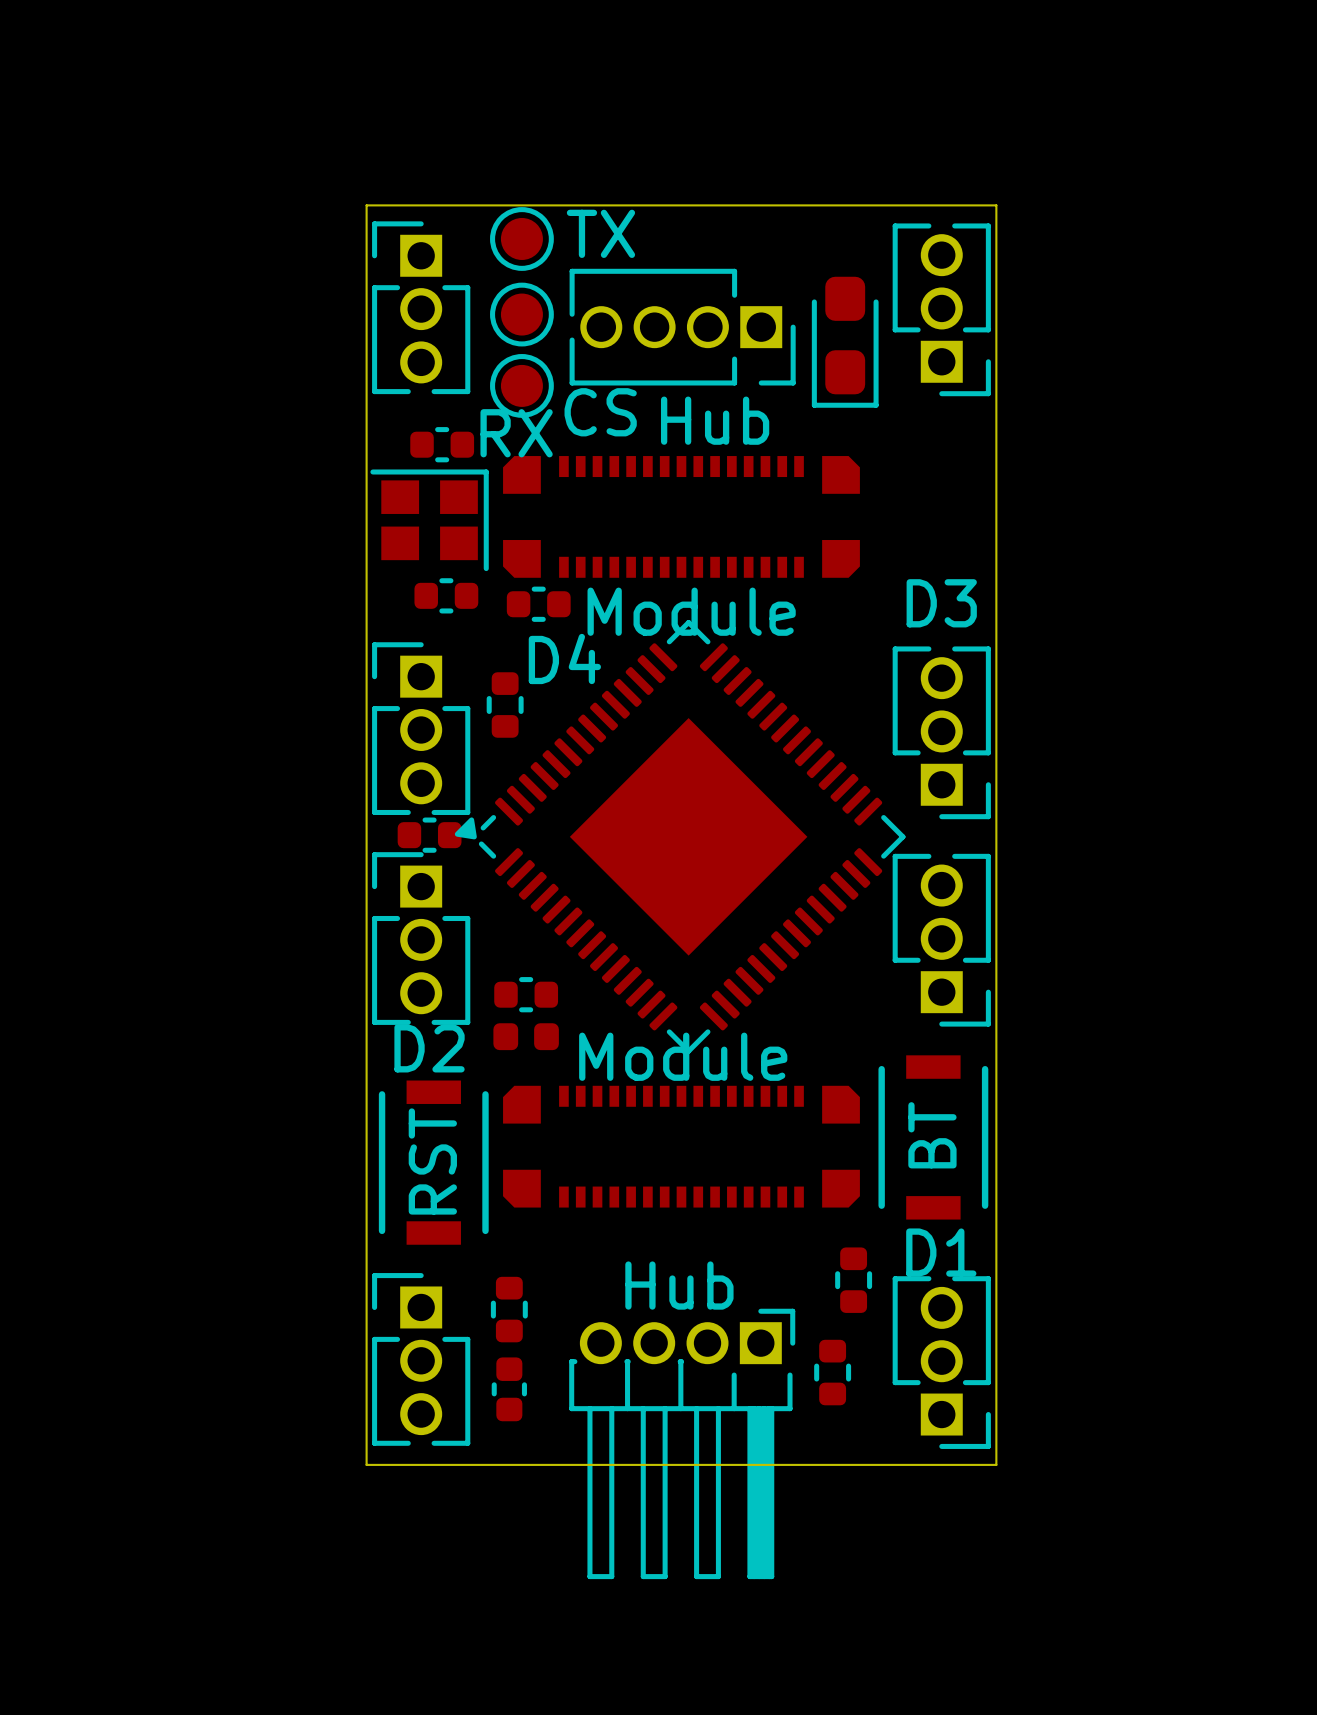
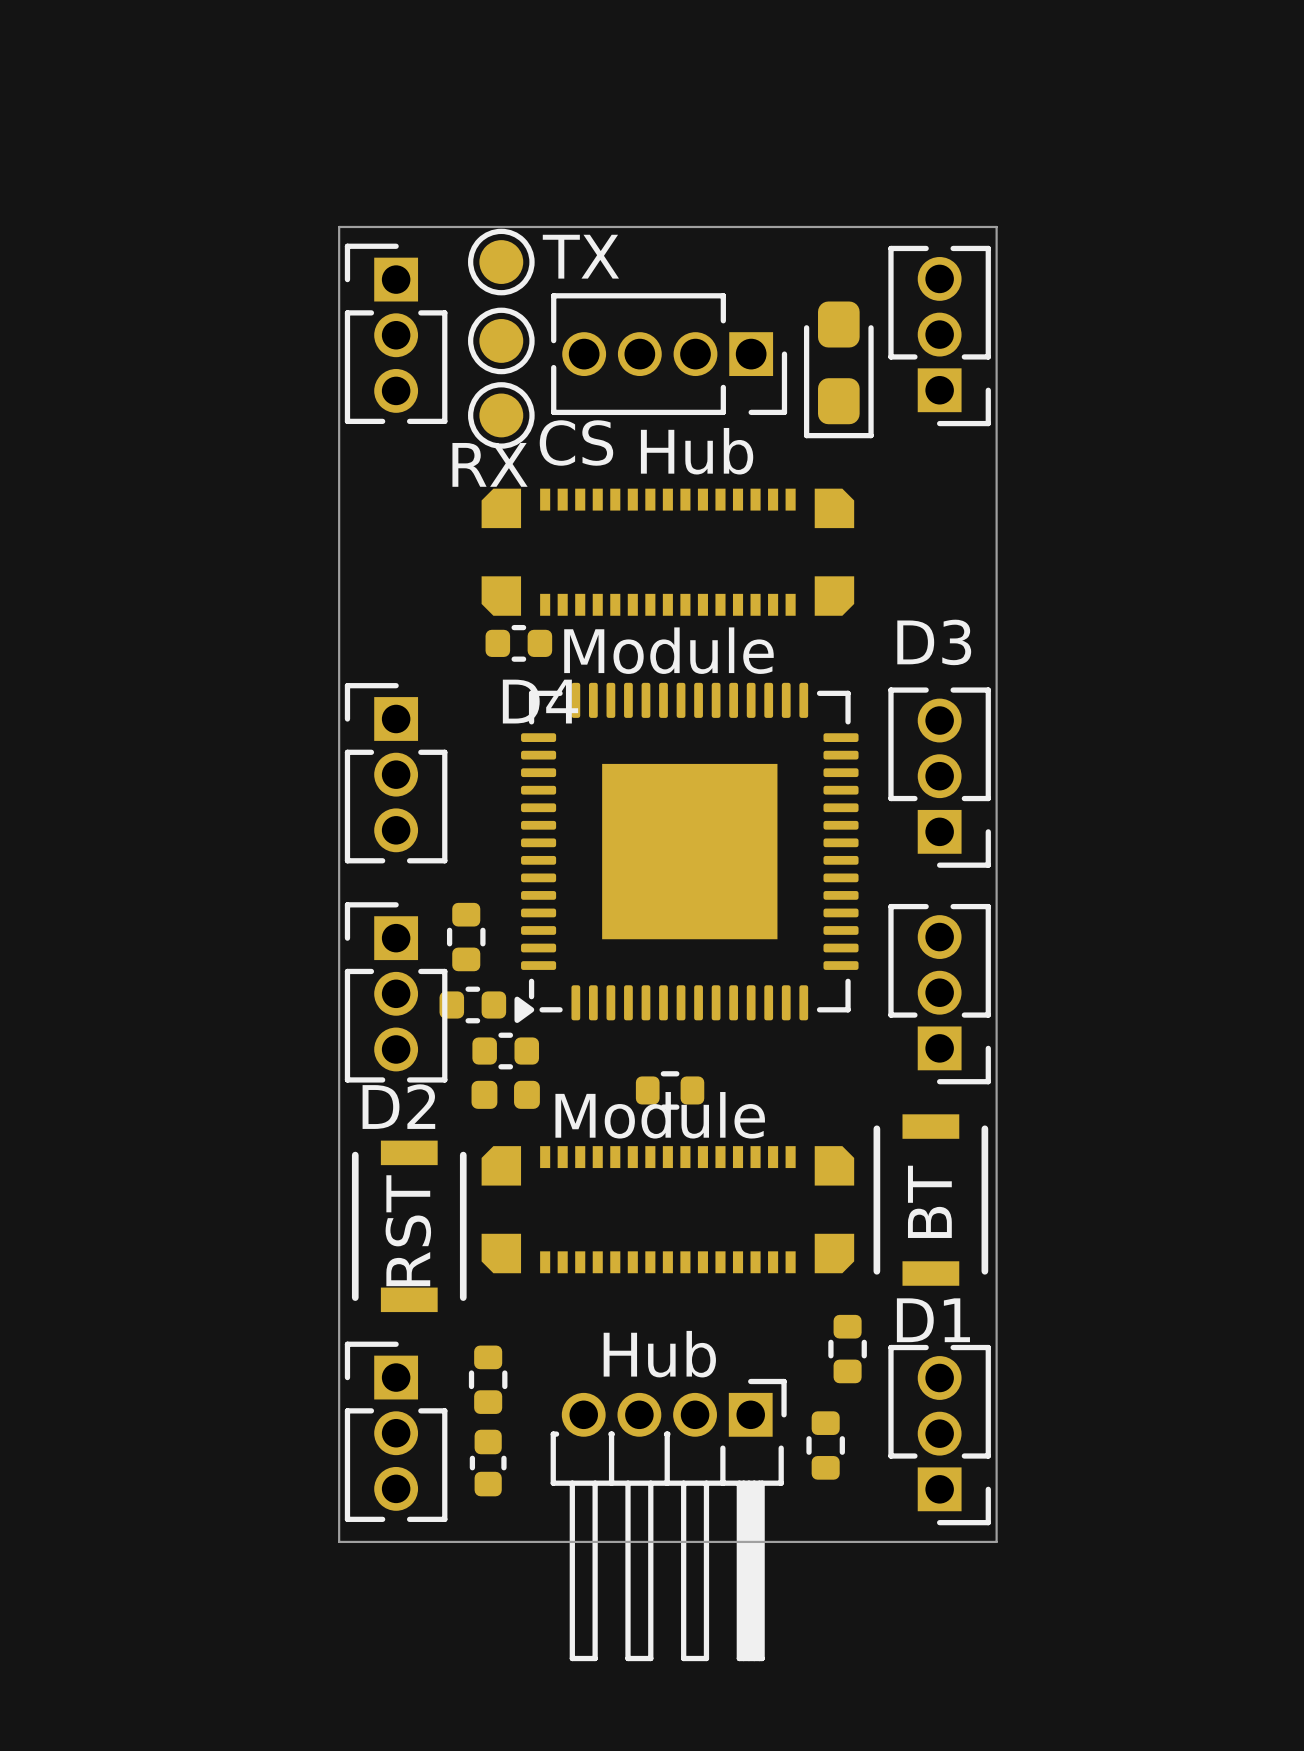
part: (442, 444) -> none
part: (429, 520) -> none
part: (446, 595) -> none
part position: (505, 705) -> (466, 937)
part position: (429, 835) -> (472, 1004)
part rotation: 0° (680, 836) -> 45° counterclockwise (686, 852)
part: none -> (670, 1090)

